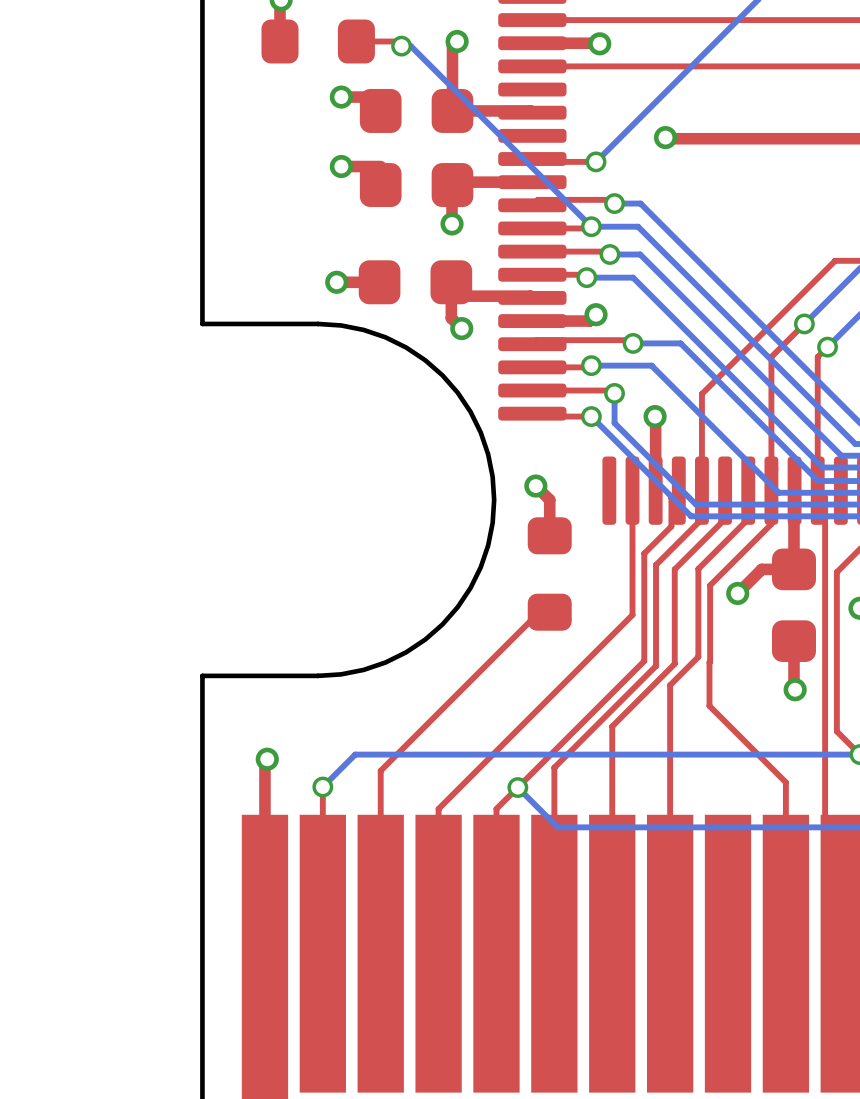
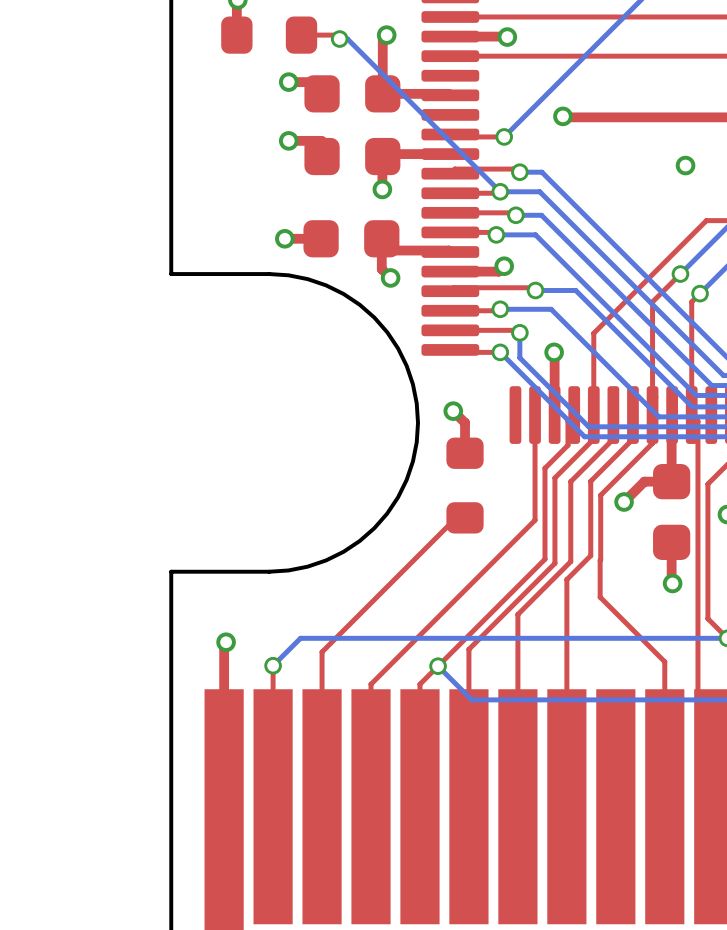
via: none -> (685, 165)

